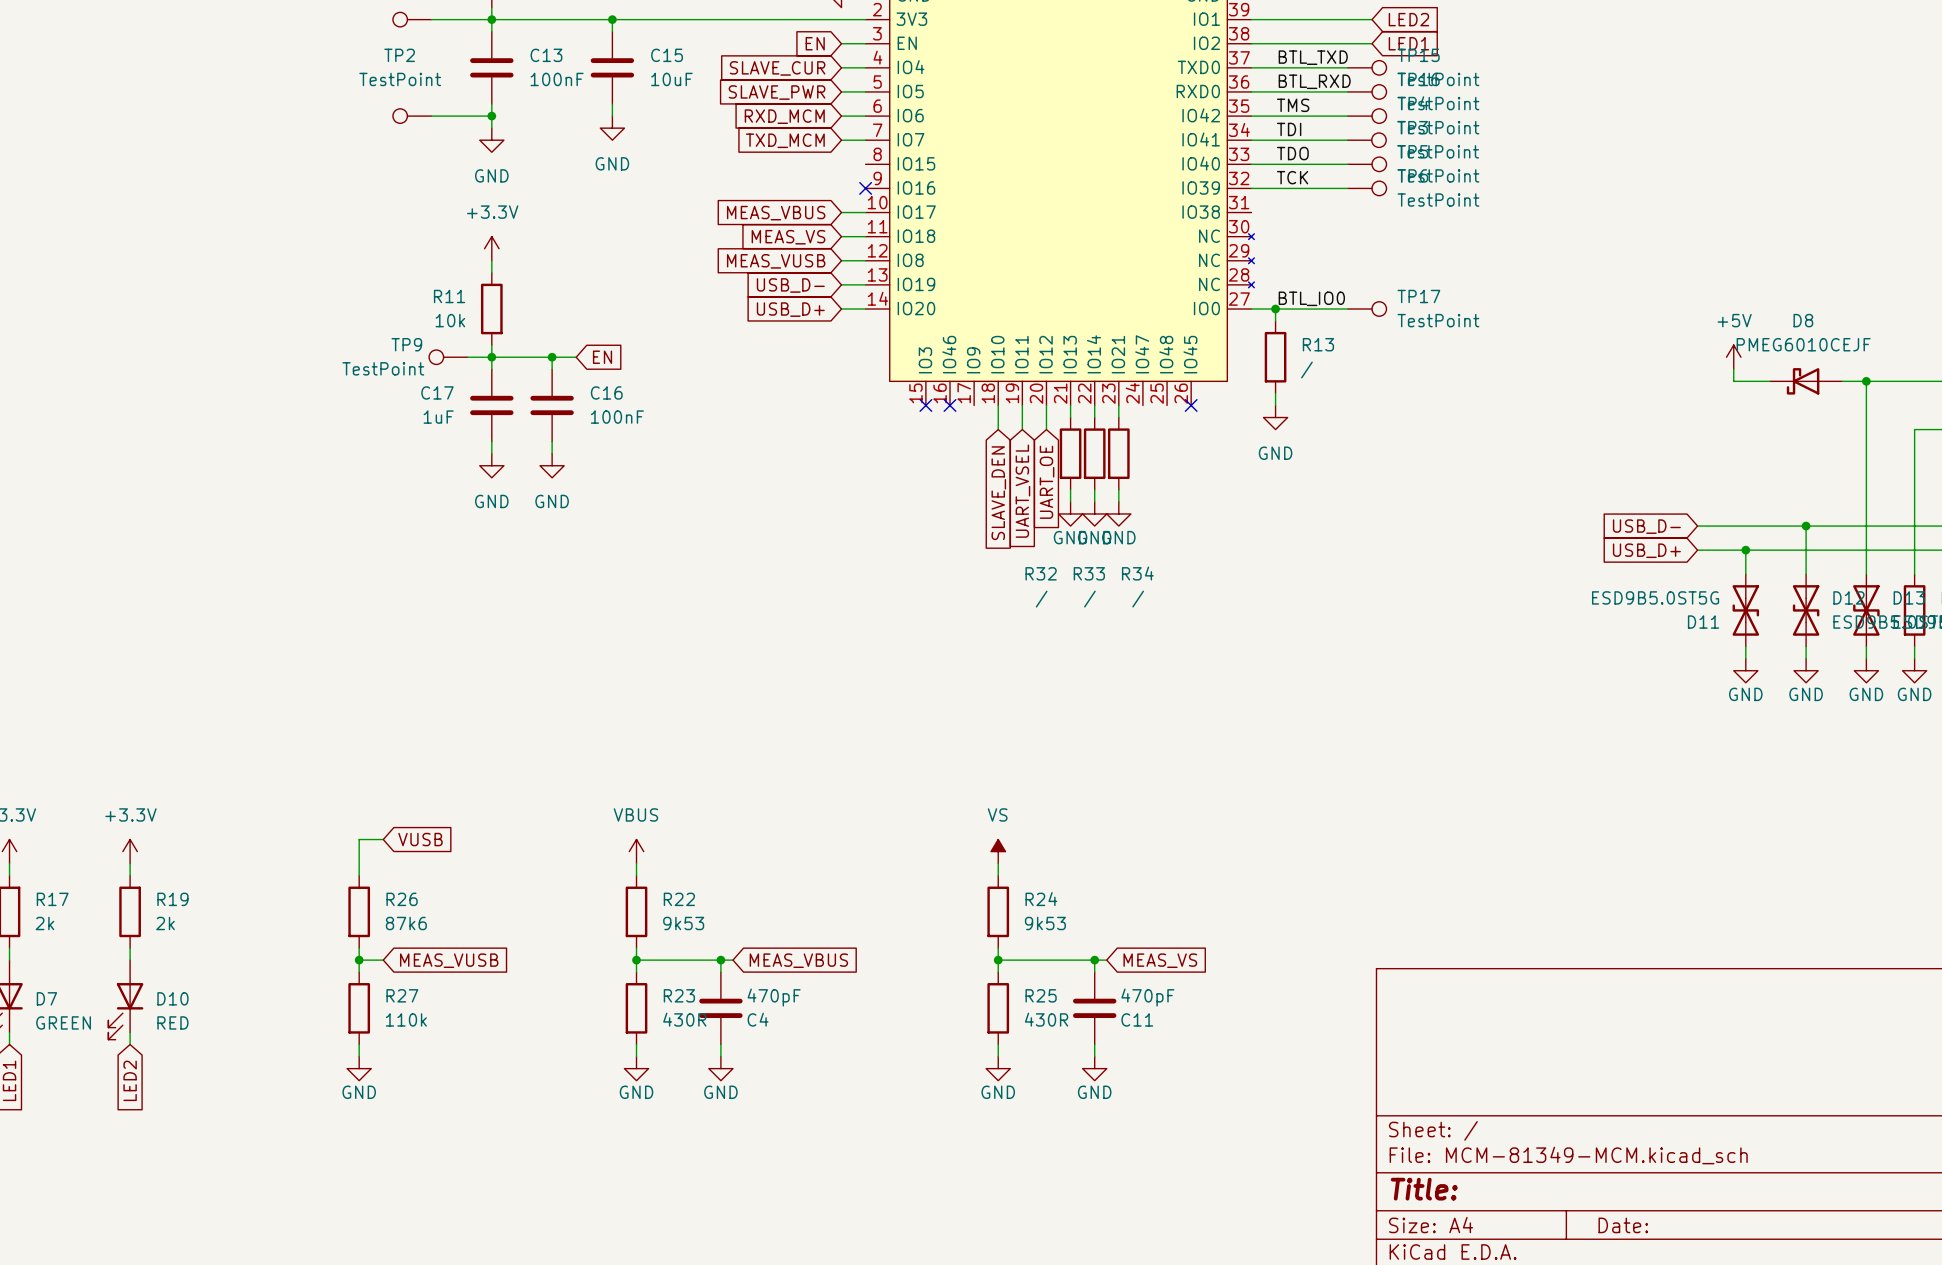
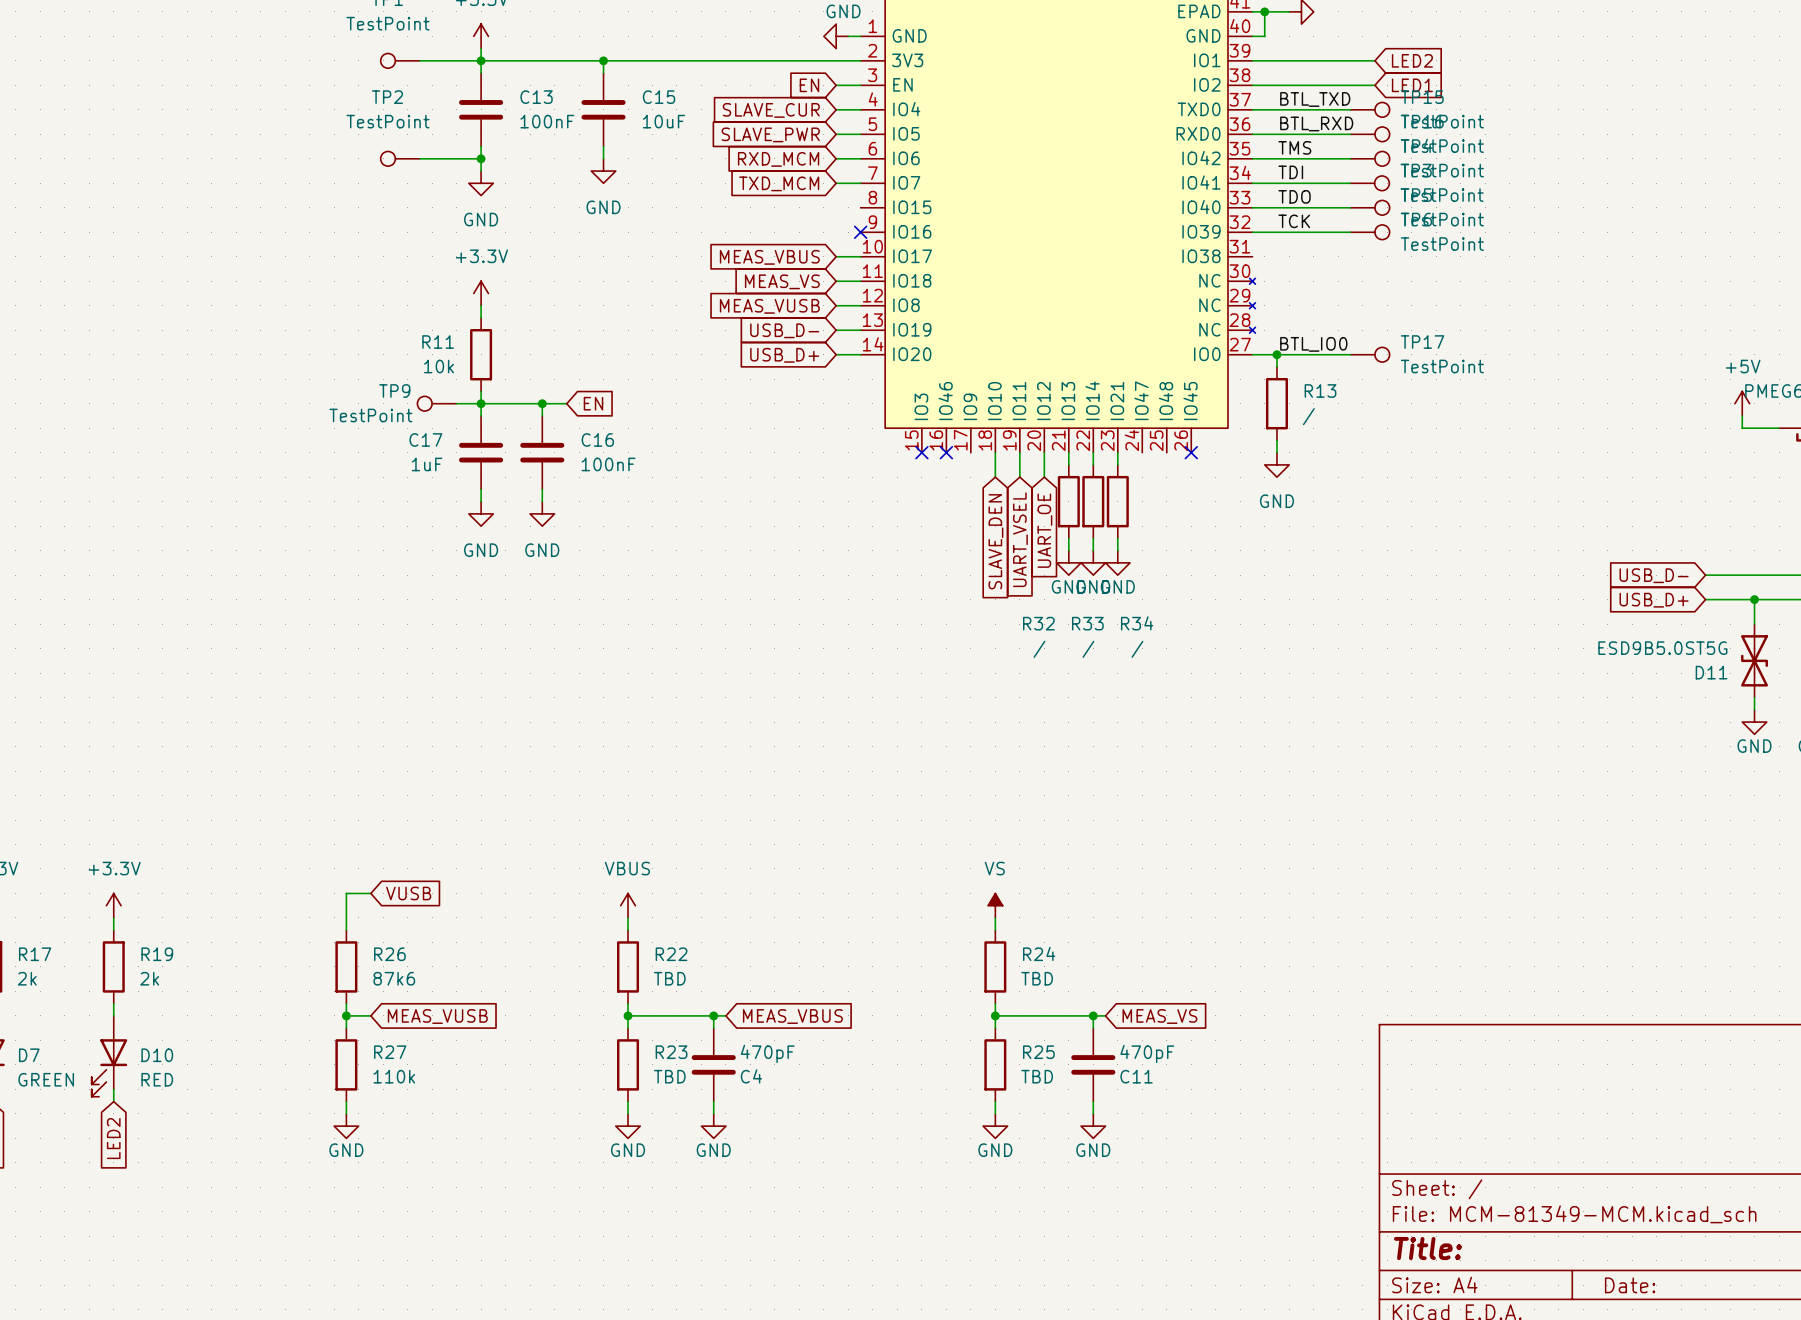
R22 value: 9k53 (683, 923) -> TBD (669, 978)
R24 value: 9k53 (1045, 923) -> TBD (1037, 978)
R23 value: 430R (684, 1019) -> TBD (669, 1076)
R25 value: 430R (1046, 1019) -> TBD (1037, 1076)

